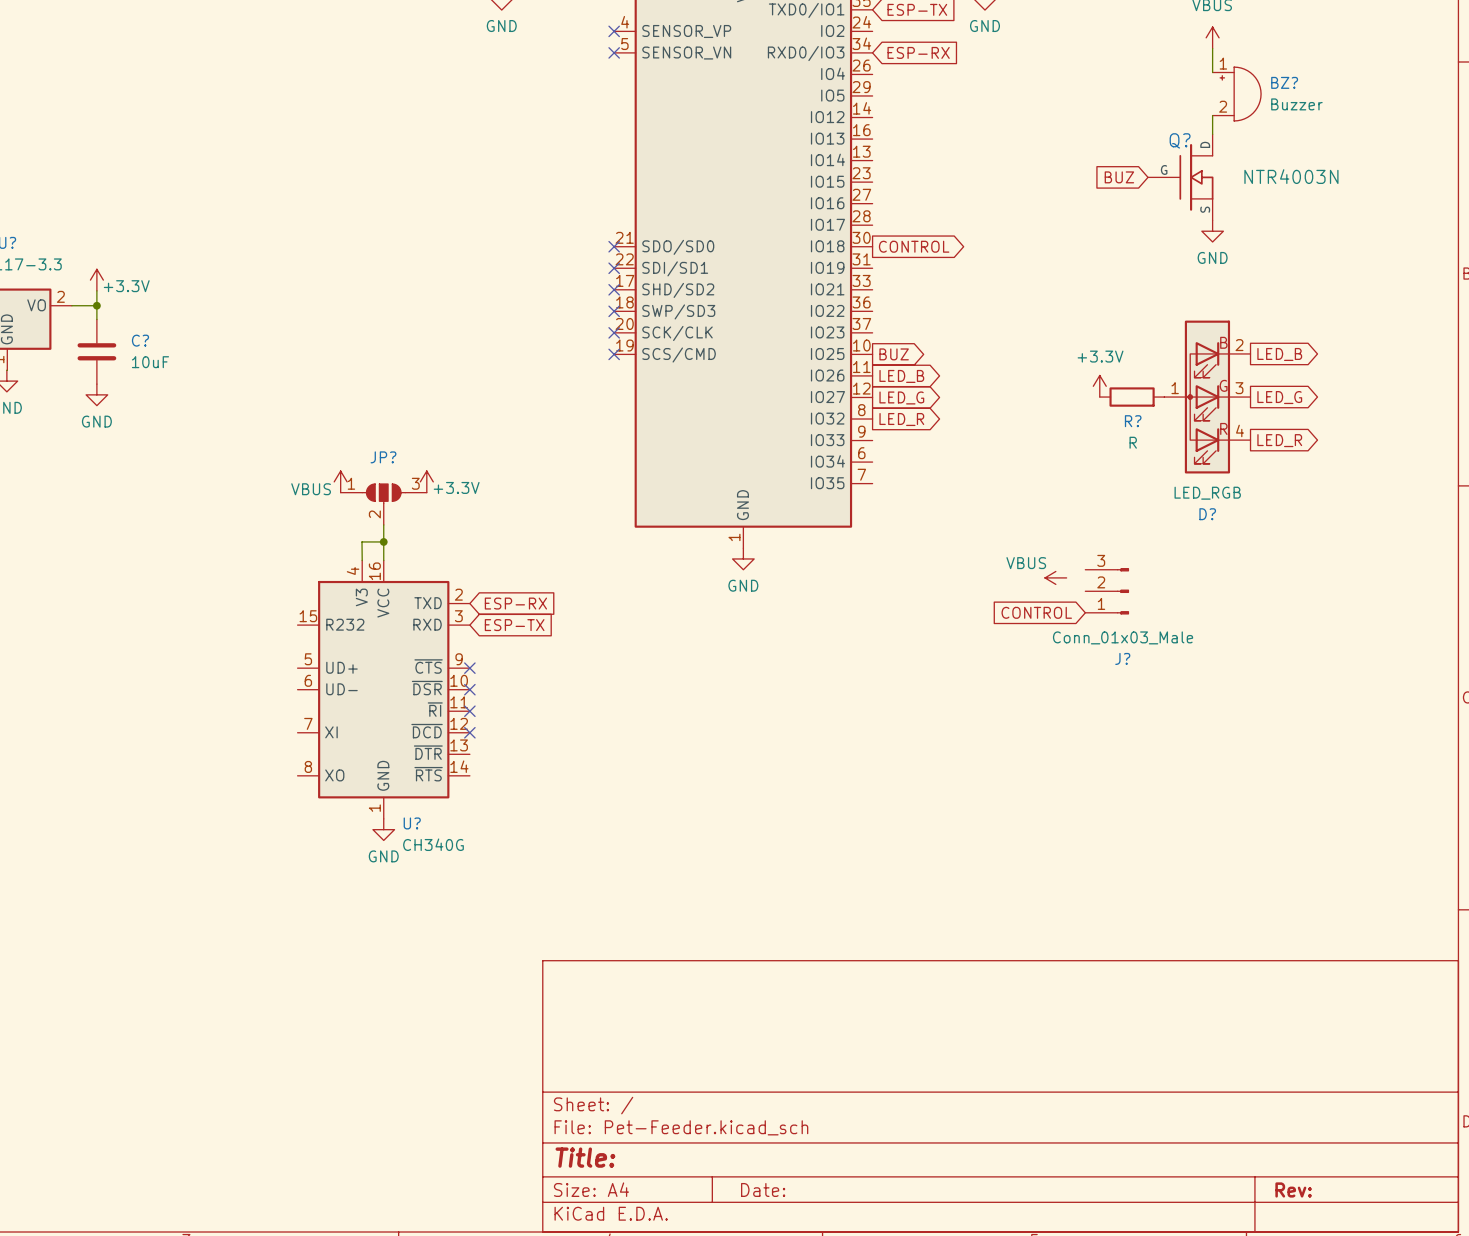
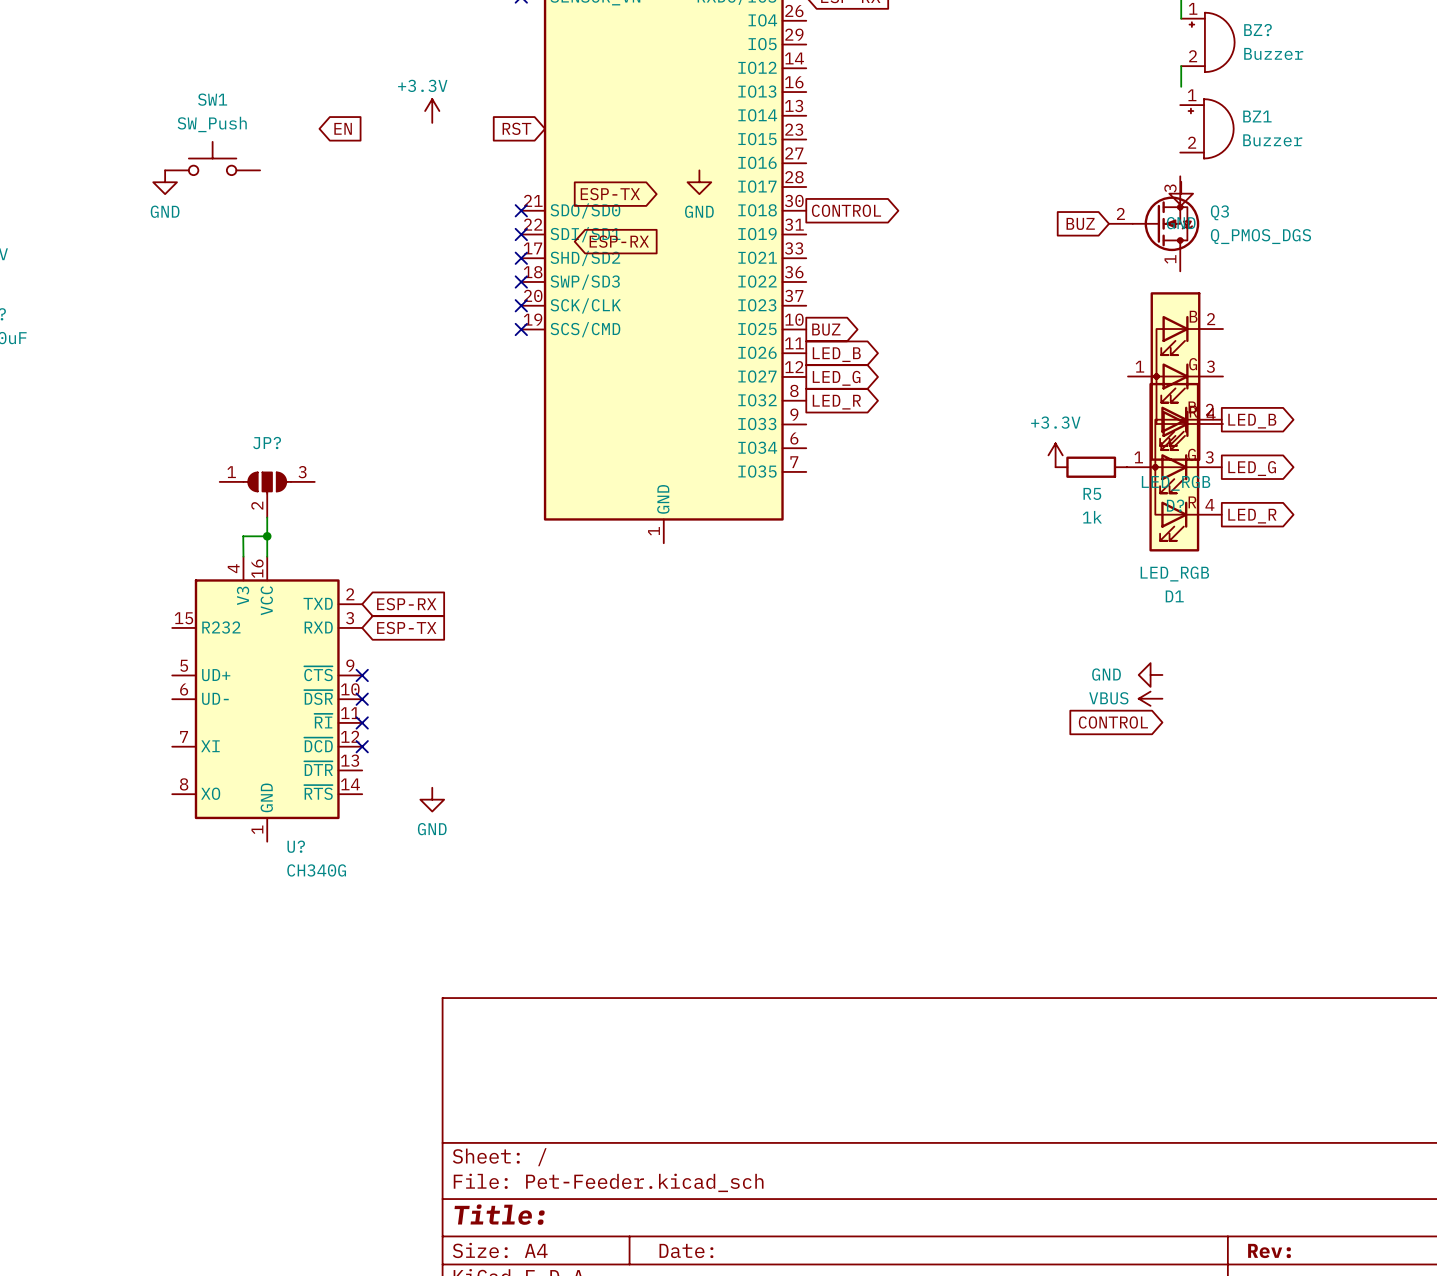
power symbol: none -> +3.3V (432, 111)
global label: none -> EN (343, 128)
global label: none -> RST (516, 128)
BZ1: none -> Buzzer (1206, 128)
global label position: BUZ (1119, 177) -> BUZ (1080, 223)
Q?: NTR4003N (1180, 177) -> none
SW1: none -> SW_Push (212, 158)
power symbol: none -> GND (165, 182)
power symbol: none -> GND (699, 182)
global label: none -> ESP-TX (610, 194)
Q3: none -> Q_PMOS_DGS (1154, 223)
global label: none -> ESP-RX (619, 241)
global label position: LED_B (1279, 354) -> LED_B (1252, 421)
power symbol position: +3.3V (1099, 386) -> +3.3V (1055, 455)
R?: R (1132, 397) -> none
global label position: LED_G (1279, 397) -> LED_G (1252, 468)
global label position: LED_R (1279, 440) -> LED_R (1252, 516)
R5: none -> 1k (1091, 467)
D1: none -> LED_RGB (1174, 467)
power symbol: VBUS (340, 481) -> none
power symbol: +3.3V (426, 481) -> none
power symbol: GND (743, 558) -> none
power symbol text position: VBUS (1026, 563) -> VBUS (1108, 698)
power symbol position: VBUS (1055, 577) -> VBUS (1150, 698)
J?: Conn_01x03_Male (1107, 591) -> none
global label position: CONTROL (1036, 612) -> CONTROL (1113, 722)
power symbol: none -> GND (1150, 674)
power symbol: none -> GND (432, 799)
power symbol: GND (383, 829) -> none

